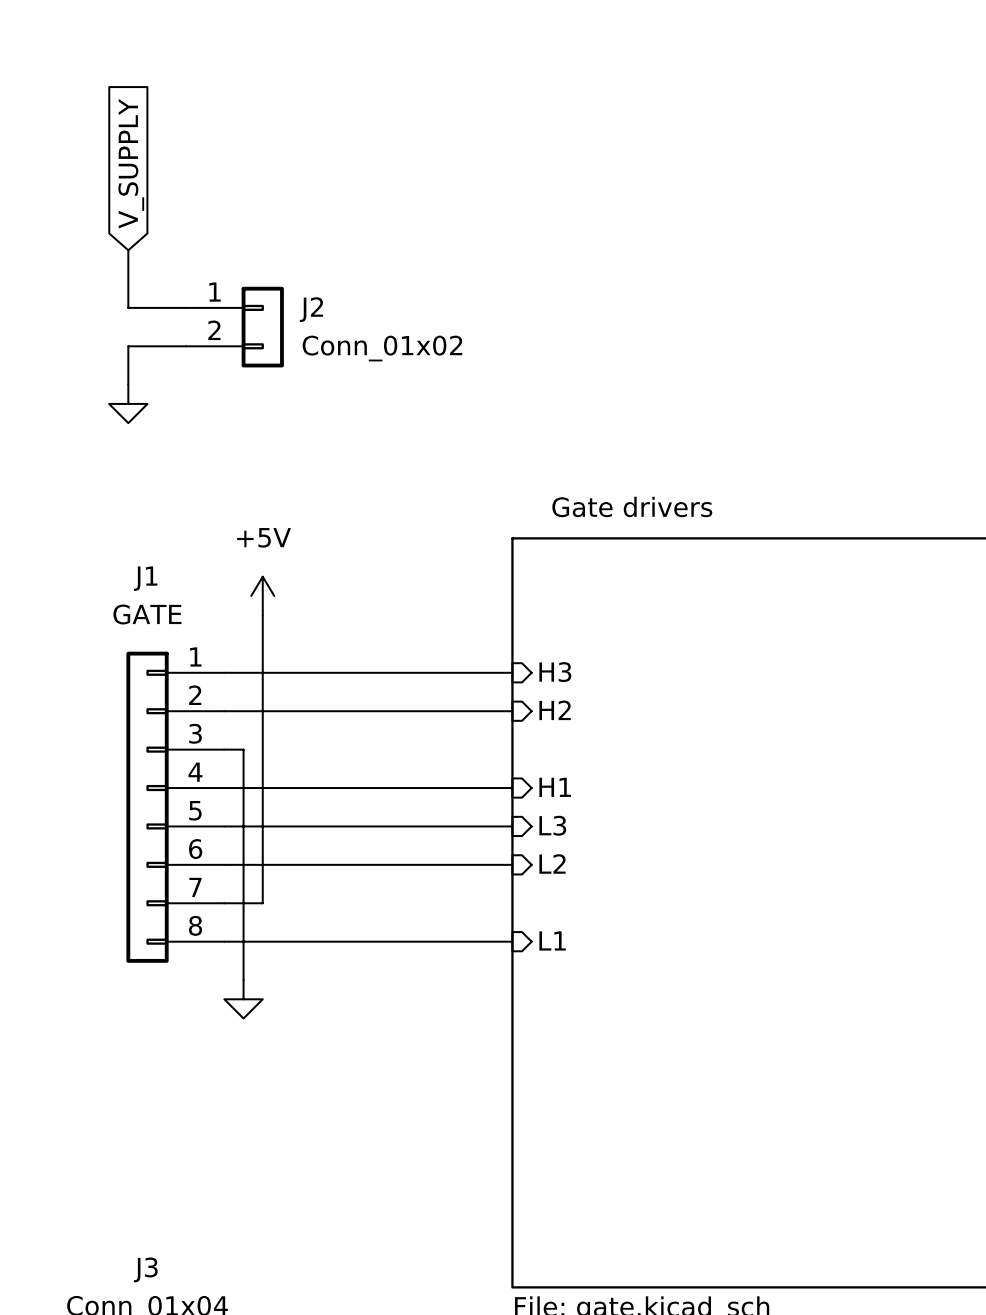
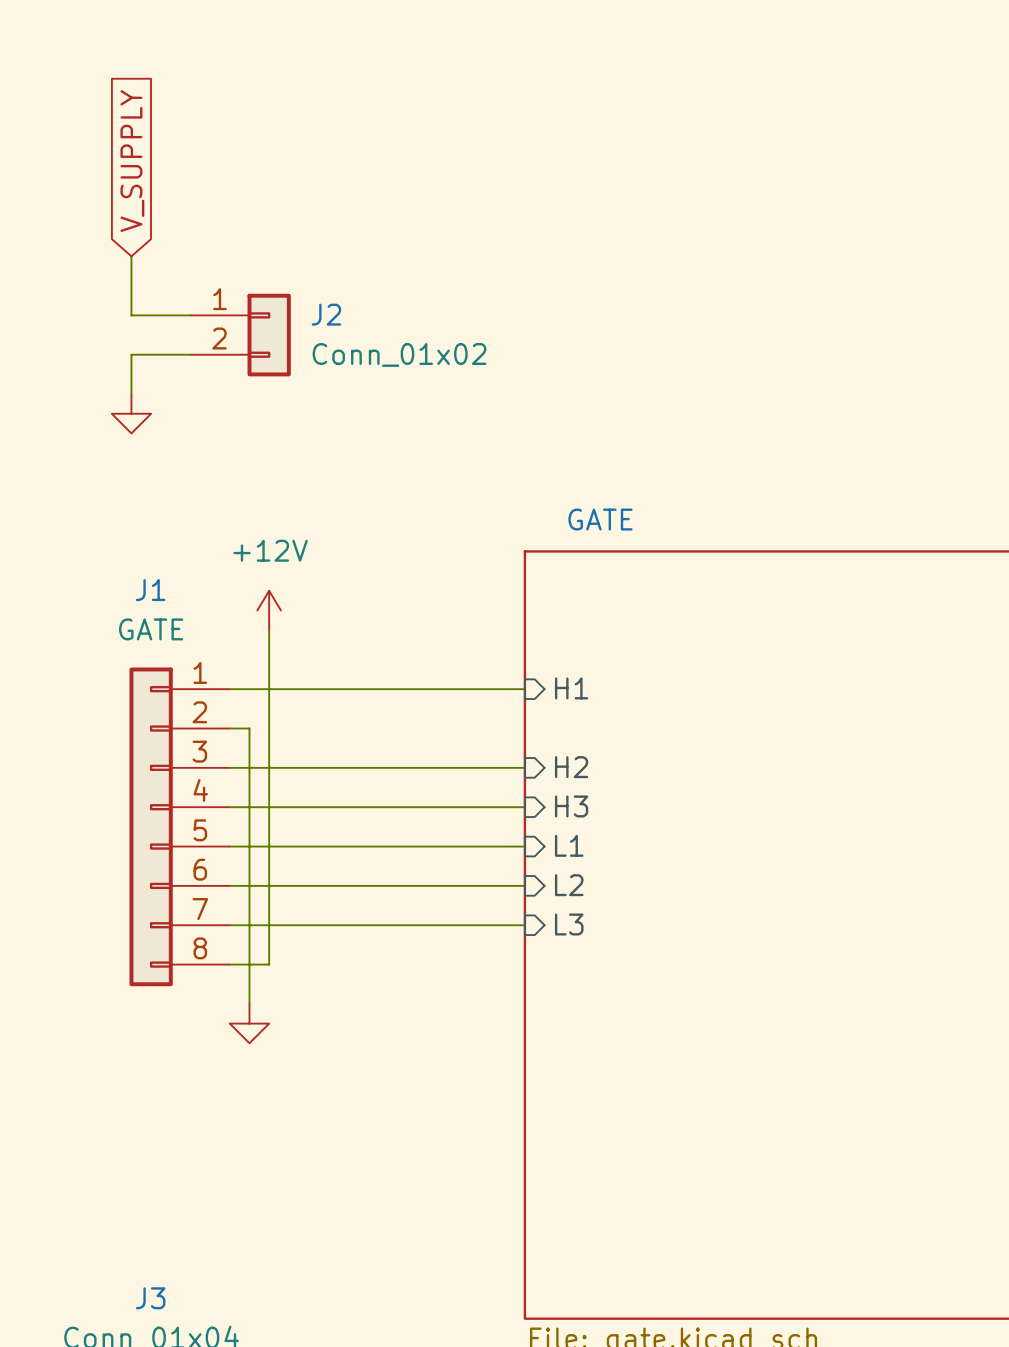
sheet Gate drivers name: Gate drivers (632, 506) -> GATE (600, 519)
power symbol: +5V (262, 595) -> +12V (269, 610)
sheet pin: H3 (555, 672) -> H1 (571, 688)
sheet pin position: H2 (555, 710) -> H2 (571, 767)
wire: (243, 711) (512, 711) -> (249, 728) (249, 767) (524, 767)
sheet pin: H1 (555, 787) -> H3 (571, 806)
sheet pin: L3 (552, 825) -> L1 (569, 845)
sheet pin: none -> L3 (569, 924)
sheet pin: L1 (552, 940) -> none
wire: (262, 941) (512, 941) -> (269, 964) (269, 925) (524, 925)

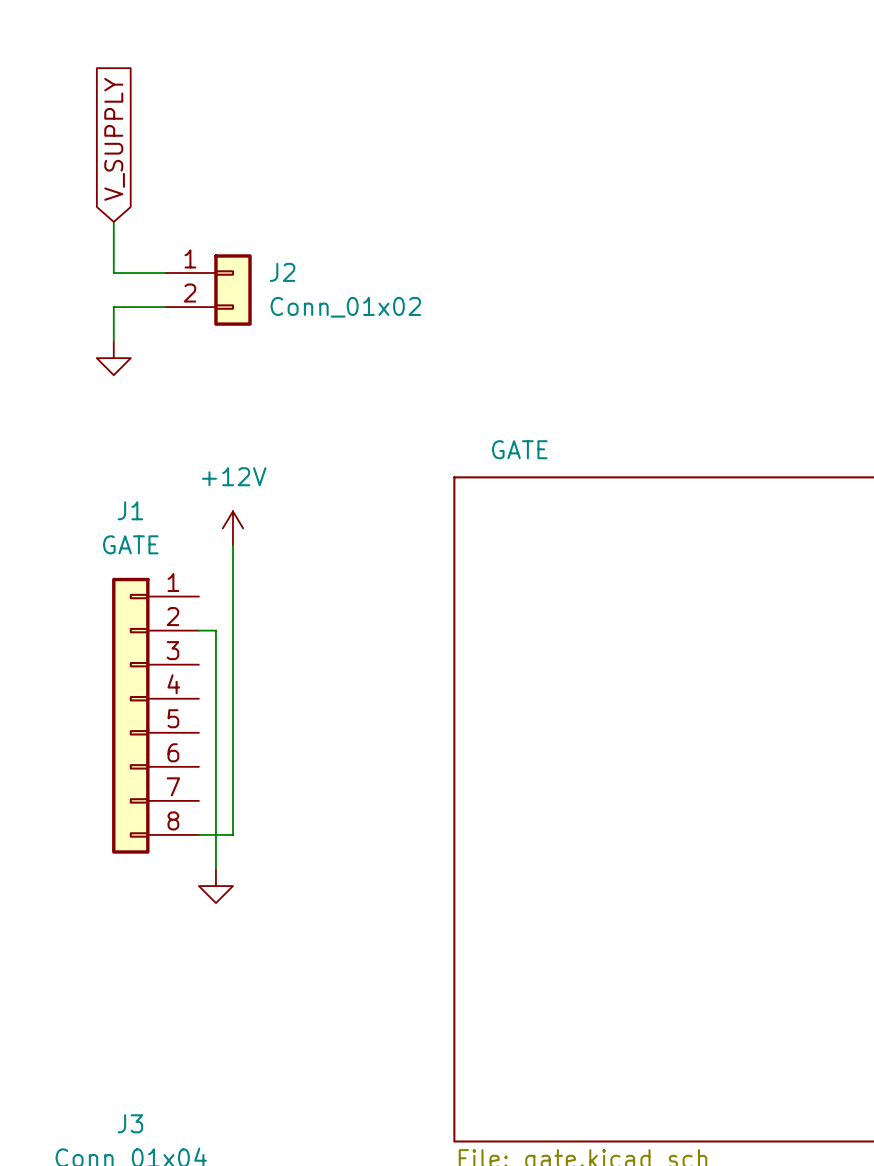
sheet pin: H1 (571, 688) -> none
wire: (229, 689) (524, 689) -> none
wire: (229, 767) (524, 767) -> none
sheet pin: H2 (571, 767) -> none
sheet pin: H3 (571, 806) -> none
wire: (229, 807) (524, 807) -> none
sheet pin: L1 (569, 845) -> none
wire: (229, 846) (524, 846) -> none
wire: (229, 885) (524, 885) -> none
sheet pin: L2 (569, 885) -> none
sheet pin: L3 (569, 924) -> none
wire: (229, 925) (524, 925) -> none

